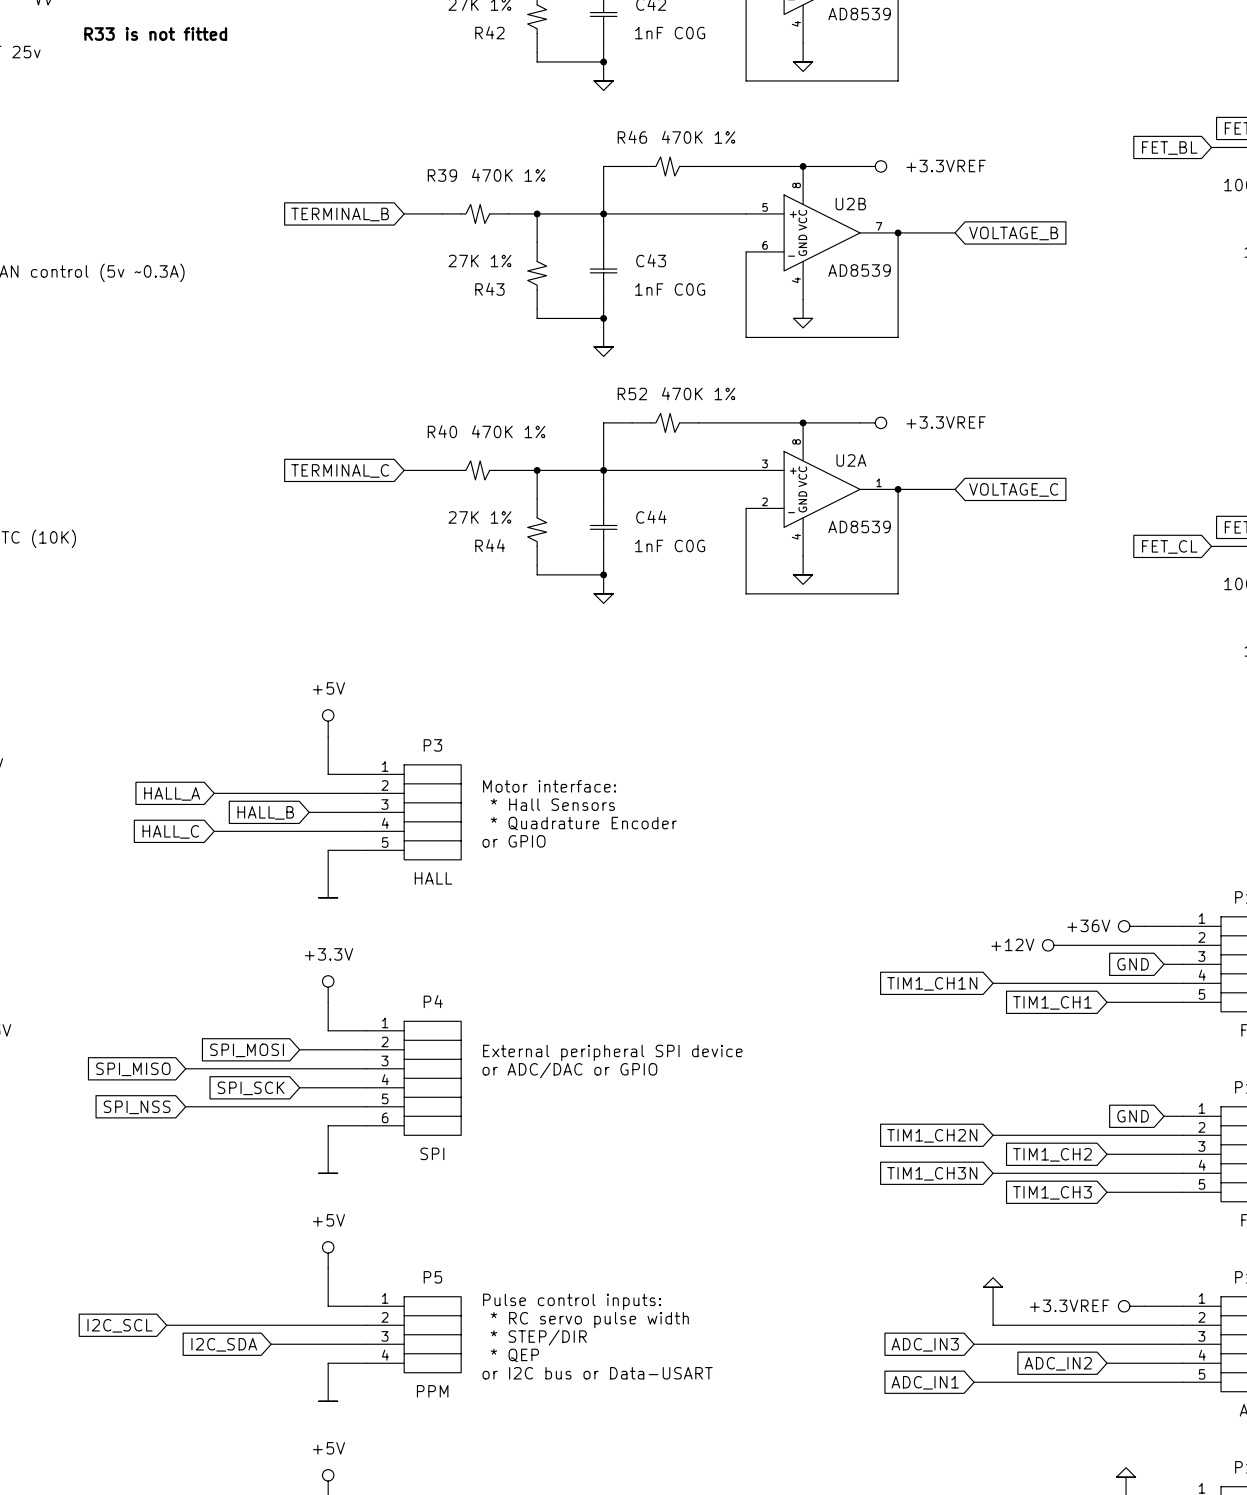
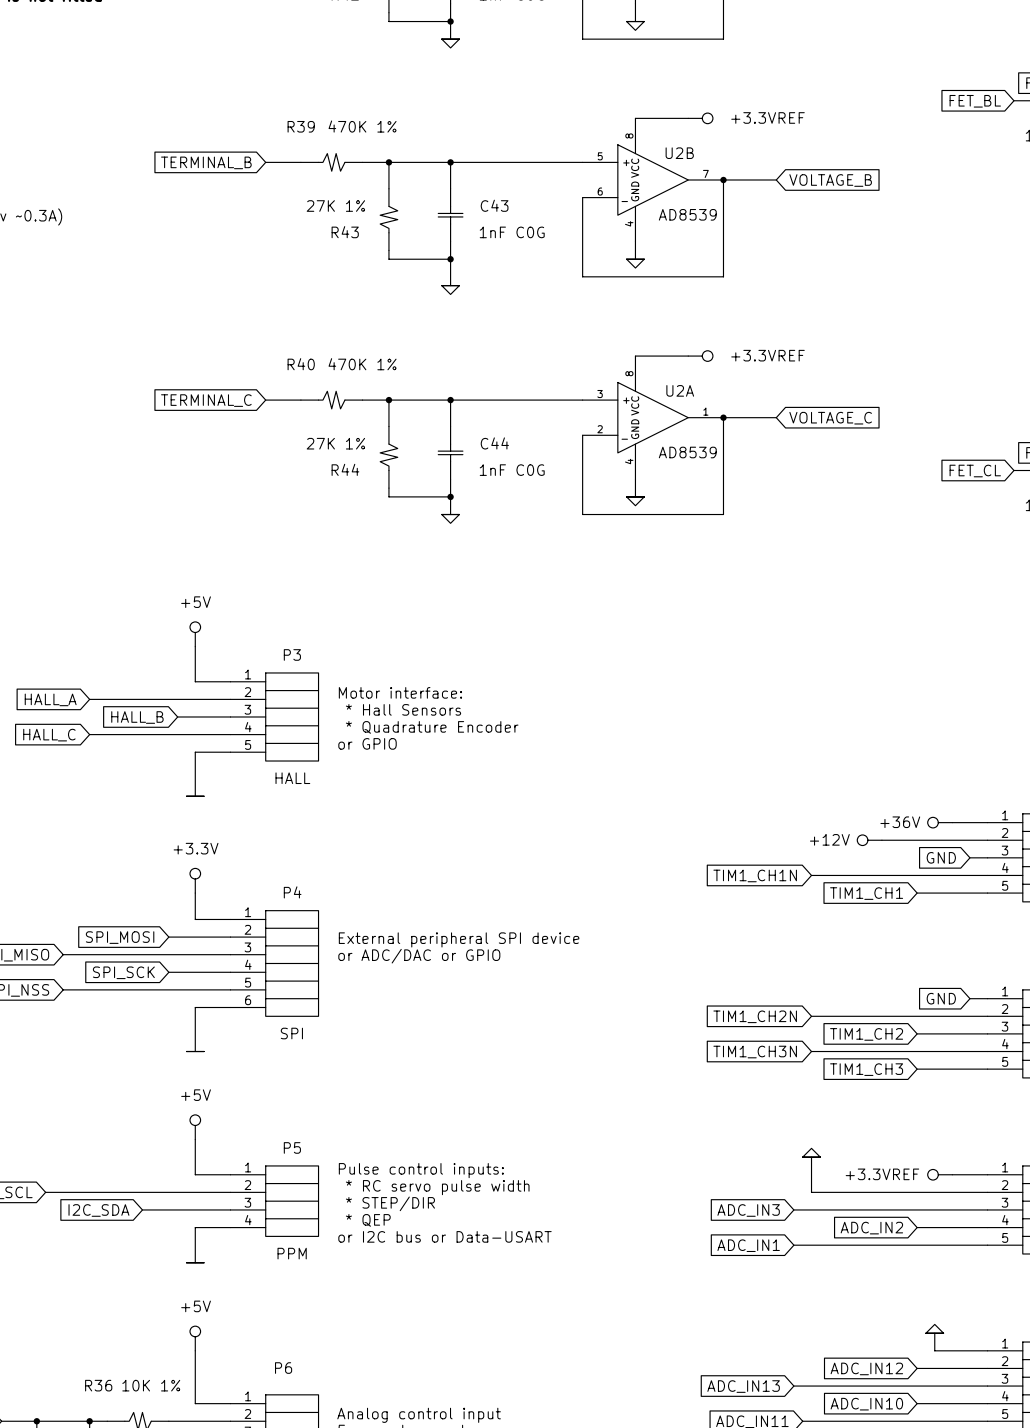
wire: (632, 166) (603, 166) (603, 213) -> none
R46: 470K 1% (665, 166) -> none
wire: (698, 166) (803, 166) -> none
junction: (803, 166) -> none
wire: (632, 422) (603, 422) (603, 470) -> none
R52: 470K 1% (665, 422) -> none
wire: (698, 422) (803, 422) -> none
junction: (803, 422) -> none

